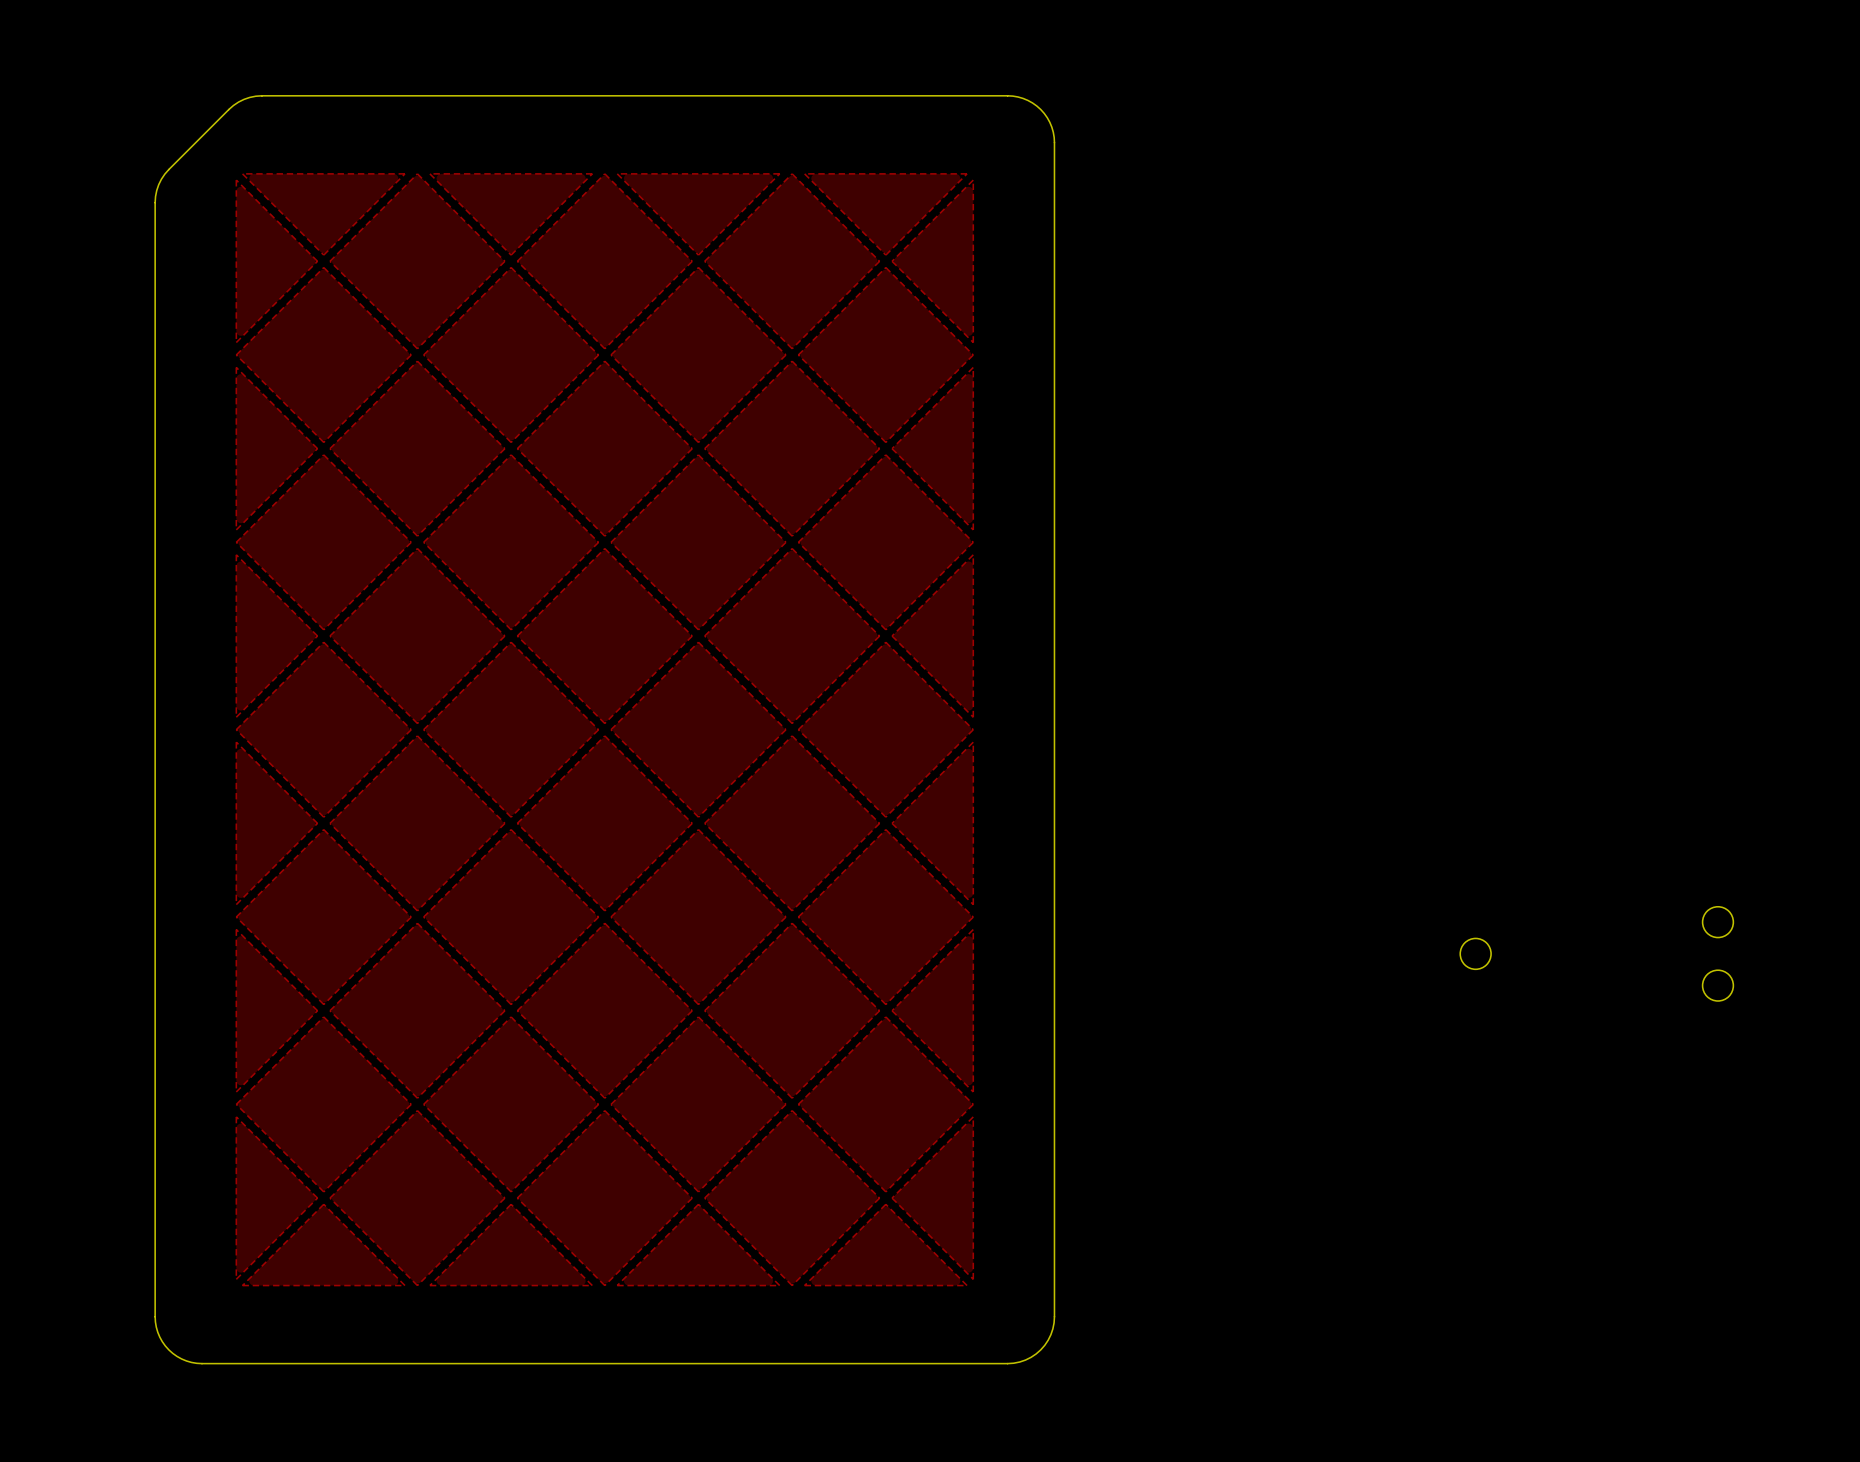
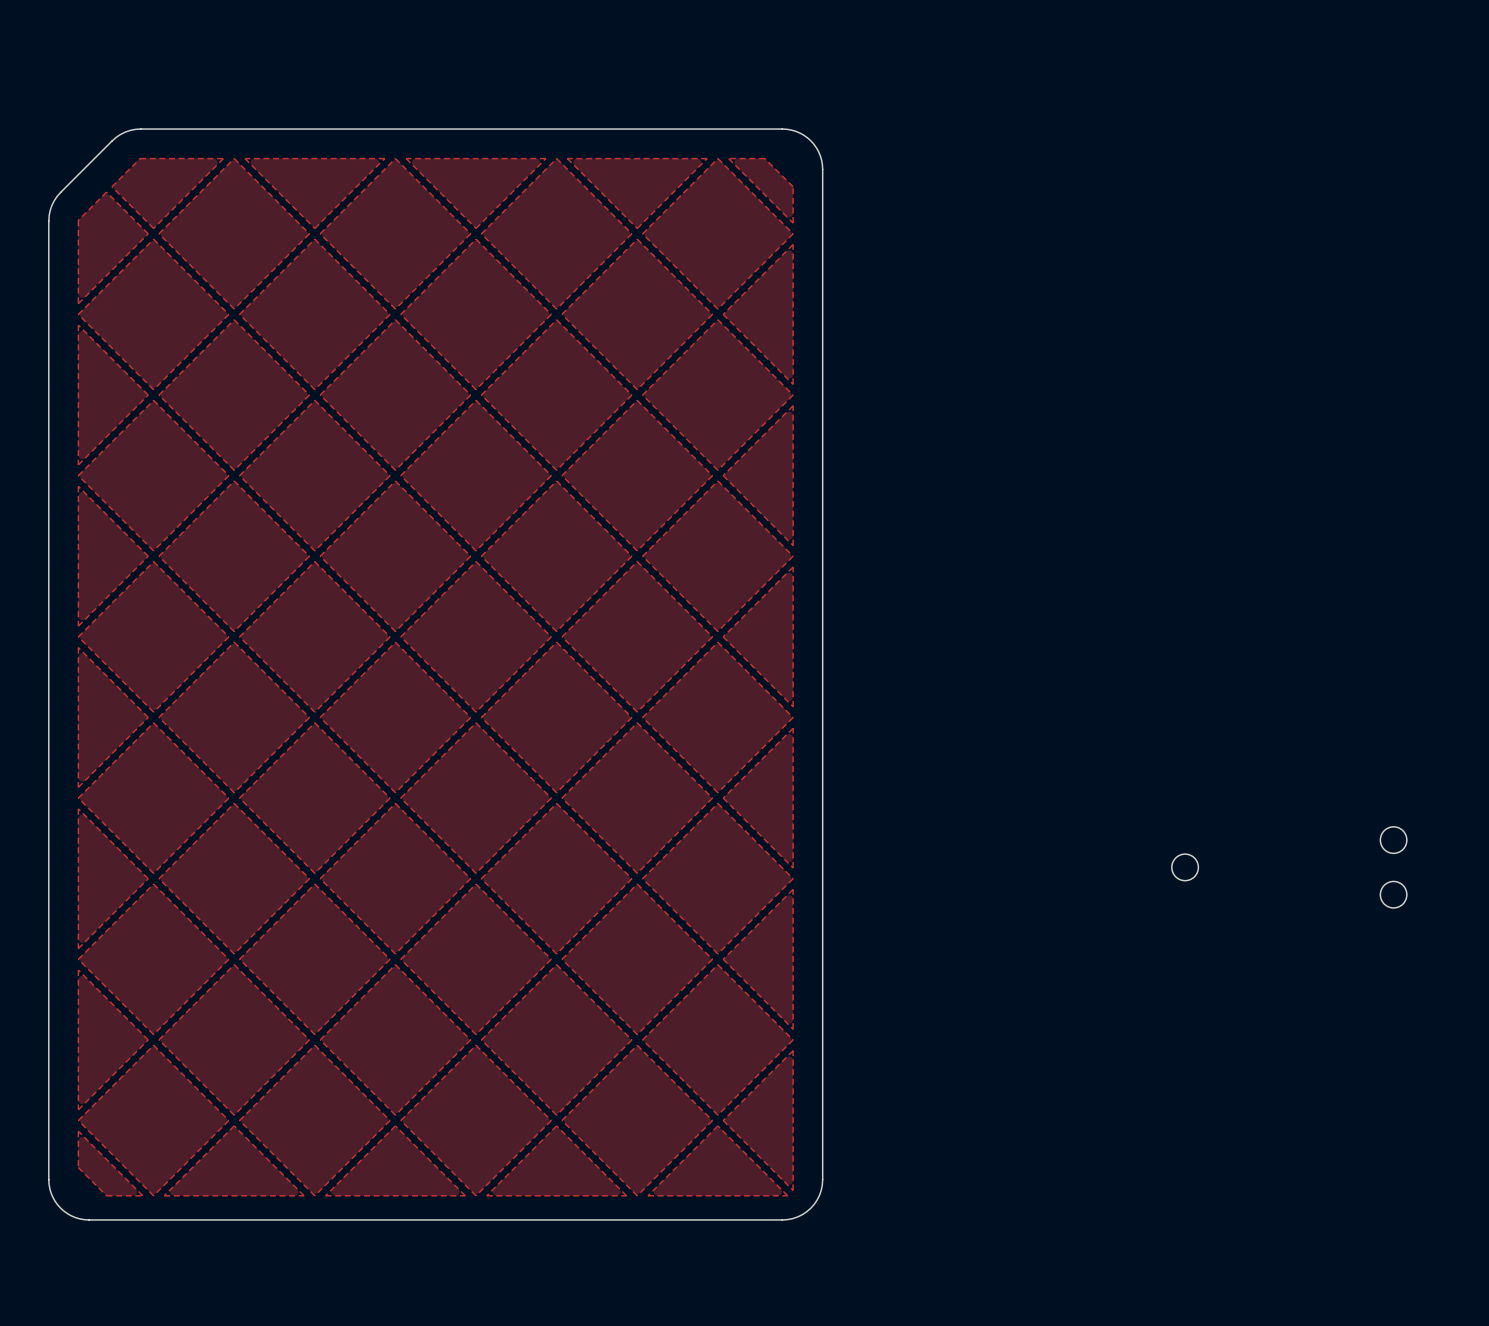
zone outline: none -> (140, 158) (223, 158) (153, 228) (111, 186) (140, 158)
zone outline: none -> (234, 158) (309, 233) (234, 309) (158, 233) (234, 158)
zone outline: none -> (395, 158) (320, 233) (395, 309) (470, 233) (395, 158)
zone outline: none -> (556, 158) (481, 233) (556, 309) (631, 233) (556, 158)
zone outline: none -> (717, 158) (642, 233) (717, 309) (793, 233) (717, 158)
zone outline: none -> (728, 158) (764, 158) (793, 186) (793, 223) (728, 158)
zone outline: none -> (106, 192) (148, 233) (78, 303) (78, 220) (106, 192)
zone outline: (242, 173) (323, 255) (404, 173) (242, 173) -> none
zone outline: (417, 173) (504, 261) (417, 348) (330, 261) (417, 173) -> (314, 239) (390, 314) (314, 389) (239, 314) (314, 239)
zone outline: (429, 173) (511, 255) (592, 173) (429, 173) -> (244, 158) (314, 228) (384, 158) (244, 158)
zone outline: (604, 173) (517, 261) (604, 348) (692, 261) (604, 173) -> (476, 239) (400, 314) (476, 389) (551, 314) (476, 239)
zone outline: (617, 173) (698, 255) (779, 173) (617, 173) -> (406, 158) (476, 228) (545, 158) (406, 158)
zone outline: (792, 173) (704, 261) (792, 348) (879, 261) (792, 173) -> (637, 239) (562, 314) (637, 389) (712, 314) (637, 239)
zone outline: (804, 173) (967, 173) (885, 255) (804, 173) -> (567, 158) (707, 158) (637, 228) (567, 158)
zone outline: (236, 180) (317, 261) (236, 342) (236, 180) -> none
zone outline: (973, 180) (892, 261) (973, 342) (973, 180) -> (793, 244) (723, 314) (793, 384) (793, 244)
zone outline: none -> (153, 239) (78, 314) (153, 389) (228, 314) (153, 239)
zone outline: (323, 267) (236, 354) (323, 442) (411, 354) (323, 267) -> (234, 319) (158, 395) (234, 470) (309, 395) (234, 319)
zone outline: (511, 267) (598, 354) (511, 442) (423, 354) (511, 267) -> (395, 319) (470, 395) (395, 470) (320, 395) (395, 319)
zone outline: (698, 267) (611, 354) (698, 442) (785, 354) (698, 267) -> (556, 319) (481, 395) (556, 470) (631, 395) (556, 319)
zone outline: (885, 267) (798, 354) (885, 442) (973, 354) (885, 267) -> (717, 319) (642, 395) (717, 470) (793, 395) (717, 319)
zone outline: (417, 361) (330, 448) (417, 536) (504, 448) (417, 361) -> (314, 400) (239, 475) (314, 550) (390, 475) (314, 400)
zone outline: (604, 361) (692, 448) (604, 536) (517, 448) (604, 361) -> (476, 400) (551, 475) (476, 550) (400, 475) (476, 400)
zone outline: (792, 361) (704, 448) (792, 536) (879, 448) (792, 361) -> (637, 400) (562, 475) (637, 550) (712, 475) (637, 400)
zone outline: (236, 367) (317, 448) (236, 529) (236, 367) -> (78, 325) (148, 395) (78, 464) (78, 325)
zone outline: (973, 367) (892, 448) (973, 529) (973, 367) -> (793, 405) (723, 475) (793, 545) (793, 405)
zone outline: none -> (153, 400) (228, 475) (153, 550) (78, 475) (153, 400)
zone outline: (323, 454) (411, 542) (323, 629) (236, 542) (323, 454) -> (234, 481) (309, 556) (234, 631) (158, 556) (234, 481)
zone outline: (511, 454) (423, 542) (511, 629) (598, 542) (511, 454) -> (395, 481) (320, 556) (395, 631) (470, 556) (395, 481)
zone outline: (698, 454) (785, 542) (698, 629) (611, 542) (698, 454) -> (556, 481) (631, 556) (556, 631) (481, 556) (556, 481)
zone outline: (885, 454) (798, 542) (885, 629) (973, 542) (885, 454) -> (717, 481) (642, 556) (717, 631) (793, 556) (717, 481)
zone outline: (417, 548) (504, 636) (417, 723) (330, 636) (417, 548) -> (314, 561) (390, 636) (314, 712) (239, 636) (314, 561)
zone outline: (604, 548) (517, 636) (604, 723) (692, 636) (604, 548) -> (476, 561) (400, 636) (476, 712) (551, 636) (476, 561)
zone outline: (792, 548) (879, 636) (792, 723) (704, 636) (792, 548) -> (637, 561) (712, 636) (637, 712) (562, 636) (637, 561)
zone outline: (236, 554) (317, 636) (236, 717) (236, 554) -> (78, 486) (148, 556) (78, 626) (78, 486)
zone outline: (973, 554) (892, 636) (973, 717) (973, 554) -> (793, 567) (723, 636) (793, 706) (793, 567)
zone outline: none -> (153, 561) (228, 636) (153, 712) (78, 636) (153, 561)
zone outline: (323, 642) (411, 729) (323, 817) (236, 729) (323, 642) -> (234, 642) (309, 717) (234, 792) (158, 717) (234, 642)
zone outline: (511, 642) (598, 729) (511, 817) (423, 729) (511, 642) -> (395, 642) (470, 717) (395, 792) (320, 717) (395, 642)
zone outline: (698, 642) (785, 729) (698, 817) (611, 729) (698, 642) -> (556, 642) (631, 717) (556, 792) (481, 717) (556, 642)
zone outline: (885, 642) (973, 729) (885, 817) (798, 729) (885, 642) -> (717, 642) (793, 717) (717, 792) (642, 717) (717, 642)
zone outline: (417, 735) (504, 823) (417, 910) (330, 823) (417, 735) -> (314, 722) (390, 798) (314, 873) (239, 798) (314, 722)
zone outline: (604, 735) (692, 823) (604, 910) (517, 823) (604, 735) -> (476, 722) (551, 798) (476, 873) (400, 798) (476, 722)
zone outline: (792, 735) (704, 823) (792, 910) (879, 823) (792, 735) -> (637, 722) (562, 798) (637, 873) (712, 798) (637, 722)
zone outline: (236, 742) (317, 823) (236, 904) (236, 742) -> (78, 647) (148, 717) (78, 787) (78, 647)
zone outline: (973, 742) (892, 823) (973, 904) (973, 742) -> (793, 728) (723, 798) (793, 867) (793, 728)
zone outline: none -> (153, 722) (228, 798) (153, 873) (78, 798) (153, 722)
zone outline: (323, 829) (411, 917) (323, 1004) (236, 917) (323, 829) -> (234, 803) (309, 878) (234, 953) (158, 878) (234, 803)
zone outline: (511, 829) (598, 917) (511, 1004) (423, 917) (511, 829) -> (395, 803) (470, 878) (395, 953) (320, 878) (395, 803)
zone outline: (698, 829) (785, 917) (698, 1004) (611, 917) (698, 829) -> (556, 803) (631, 878) (556, 953) (481, 878) (556, 803)
zone outline: (885, 829) (973, 917) (885, 1004) (798, 917) (885, 829) -> (717, 803) (793, 878) (717, 953) (642, 878) (717, 803)
zone outline: (417, 923) (504, 1010) (417, 1098) (330, 1010) (417, 923) -> (314, 884) (390, 959) (314, 1034) (239, 959) (314, 884)
zone outline: (604, 923) (692, 1010) (604, 1098) (517, 1010) (604, 923) -> (476, 884) (551, 959) (476, 1034) (400, 959) (476, 884)
zone outline: (792, 923) (879, 1010) (792, 1098) (704, 1010) (792, 923) -> (637, 884) (712, 959) (637, 1034) (562, 959) (637, 884)
zone outline: (236, 929) (317, 1010) (236, 1091) (236, 929) -> (78, 808) (148, 878) (78, 948) (78, 808)
zone outline: (973, 929) (892, 1010) (973, 1091) (973, 929) -> (793, 889) (723, 959) (793, 1029) (793, 889)
zone outline: none -> (153, 884) (228, 959) (153, 1034) (78, 959) (153, 884)
zone outline: (323, 1017) (411, 1104) (323, 1191) (236, 1104) (323, 1017) -> (234, 964) (309, 1039) (234, 1115) (158, 1039) (234, 964)
zone outline: (511, 1017) (598, 1104) (511, 1191) (423, 1104) (511, 1017) -> (395, 964) (470, 1039) (395, 1115) (320, 1039) (395, 964)
zone outline: (698, 1017) (785, 1104) (698, 1191) (611, 1104) (698, 1017) -> (556, 964) (631, 1039) (556, 1115) (481, 1039) (556, 964)
zone outline: (885, 1017) (973, 1104) (885, 1191) (798, 1104) (885, 1017) -> (717, 964) (793, 1039) (717, 1115) (642, 1039) (717, 964)
zone outline: (417, 1110) (330, 1198) (417, 1285) (504, 1198) (417, 1110) -> (314, 1045) (239, 1120) (314, 1195) (390, 1120) (314, 1045)
zone outline: (604, 1110) (692, 1198) (604, 1285) (517, 1198) (604, 1110) -> (476, 1045) (551, 1120) (476, 1195) (400, 1120) (476, 1045)
zone outline: (792, 1110) (879, 1198) (792, 1285) (704, 1198) (792, 1110) -> (637, 1045) (712, 1120) (637, 1195) (562, 1120) (637, 1045)
zone outline: (236, 1116) (317, 1198) (236, 1279) (236, 1116) -> (78, 970) (148, 1039) (78, 1109) (78, 970)
zone outline: (973, 1116) (892, 1198) (973, 1279) (973, 1116) -> (793, 1050) (723, 1120) (793, 1190) (793, 1050)
zone outline: none -> (153, 1045) (228, 1120) (153, 1195) (78, 1120) (153, 1045)
zone outline: (323, 1204) (404, 1285) (242, 1285) (323, 1204) -> (234, 1125) (304, 1195) (164, 1195) (234, 1125)
zone outline: (511, 1204) (592, 1285) (429, 1285) (511, 1204) -> (395, 1125) (465, 1195) (325, 1195) (395, 1125)
zone outline: (698, 1204) (779, 1285) (617, 1285) (698, 1204) -> (556, 1125) (626, 1195) (486, 1195) (556, 1125)
zone outline: (885, 1204) (967, 1285) (804, 1285) (885, 1204) -> (717, 1125) (787, 1195) (648, 1195) (717, 1125)
zone outline: none -> (78, 1131) (78, 1167) (106, 1195) (142, 1195) (78, 1131)

